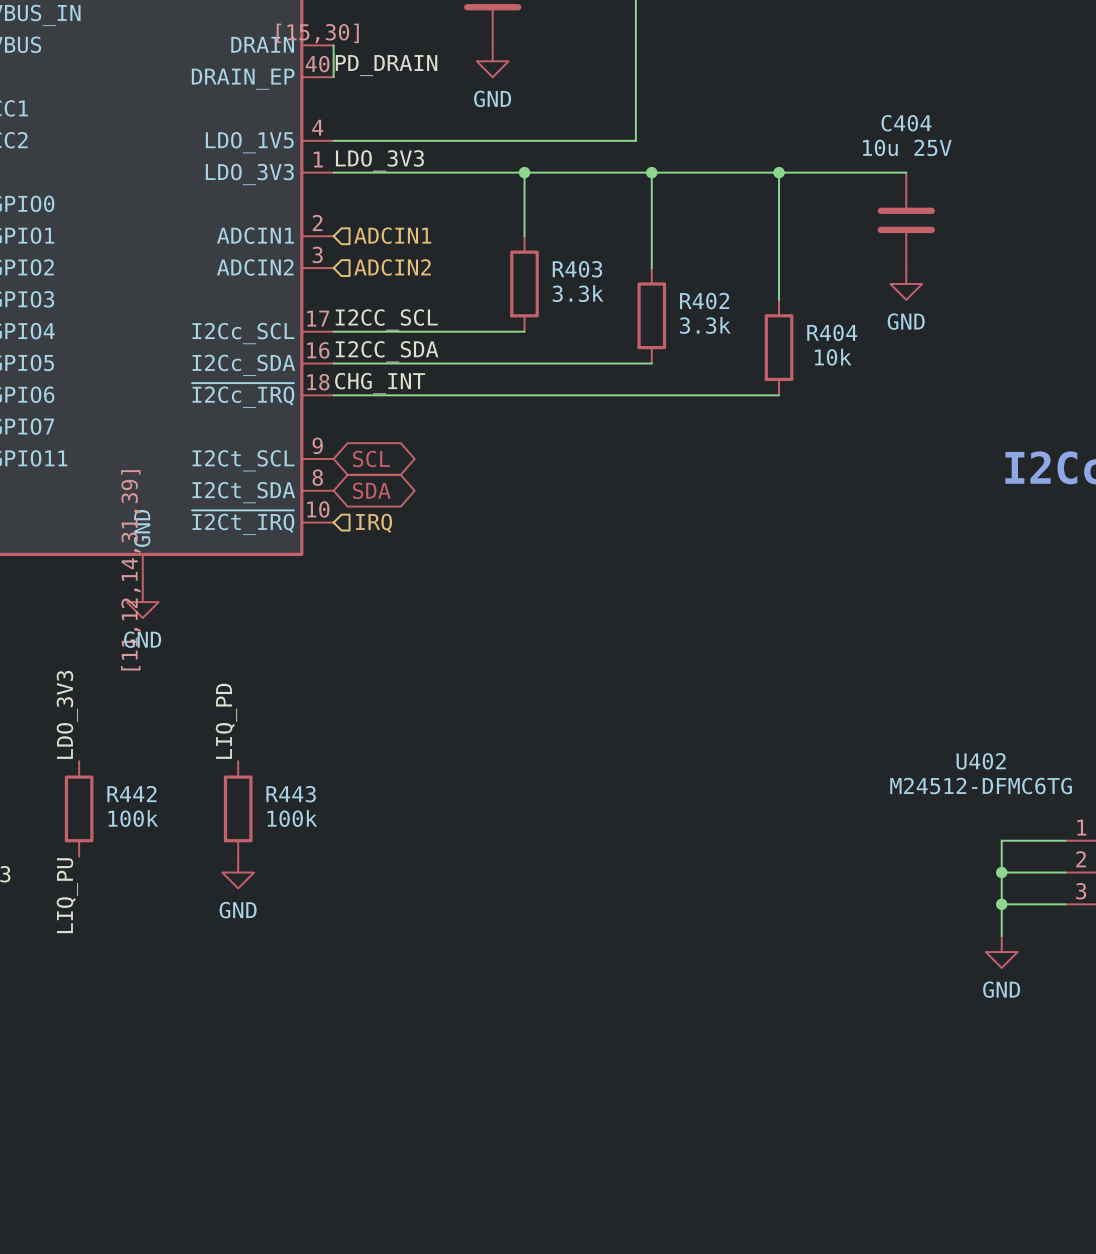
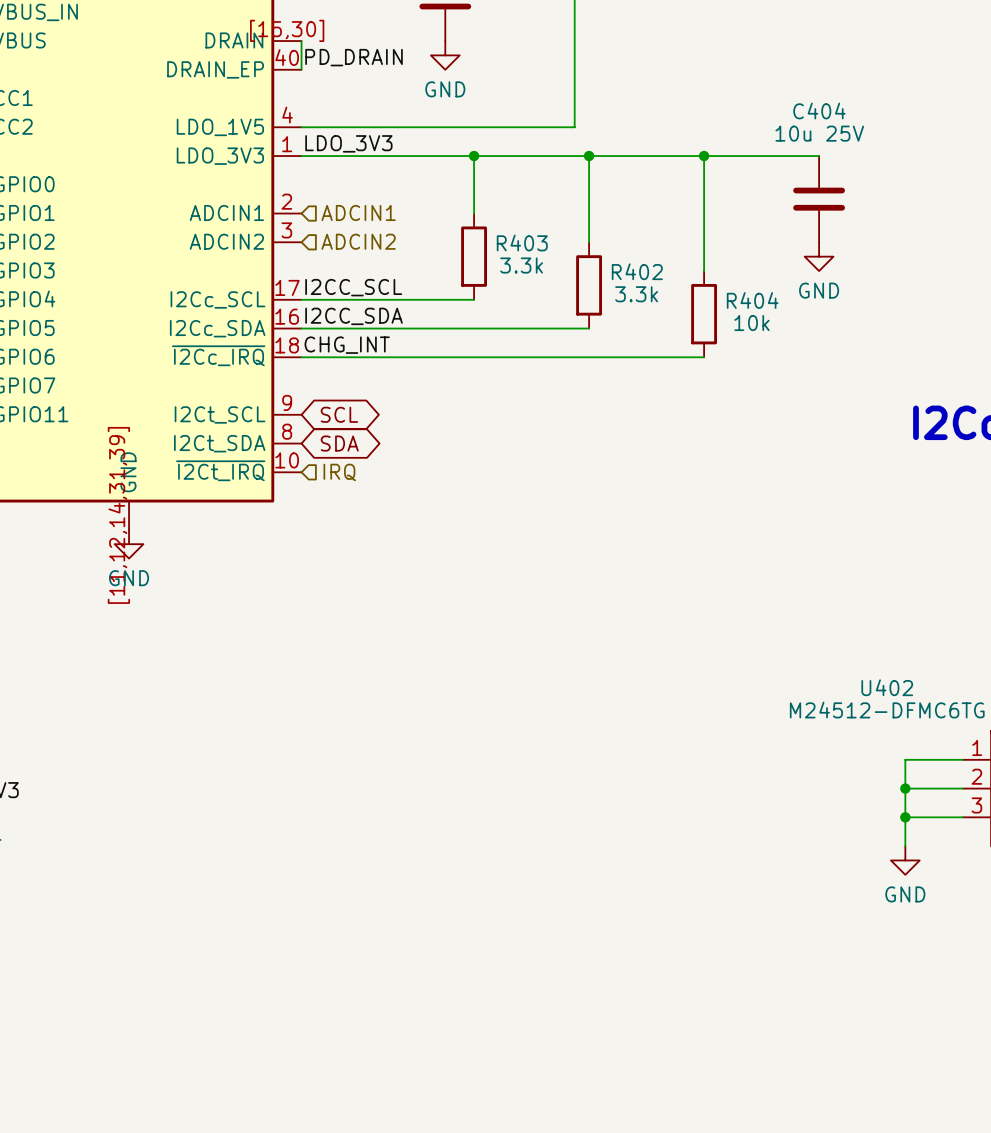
label: LDO_3V3 (67, 714) -> none
label: LIQ_PD (226, 721) -> none
R442: 100k (79, 808) -> none
R443: 100k (238, 808) -> none
power symbol: GND (238, 872) -> none
label: LIQ_PU (67, 895) -> none

